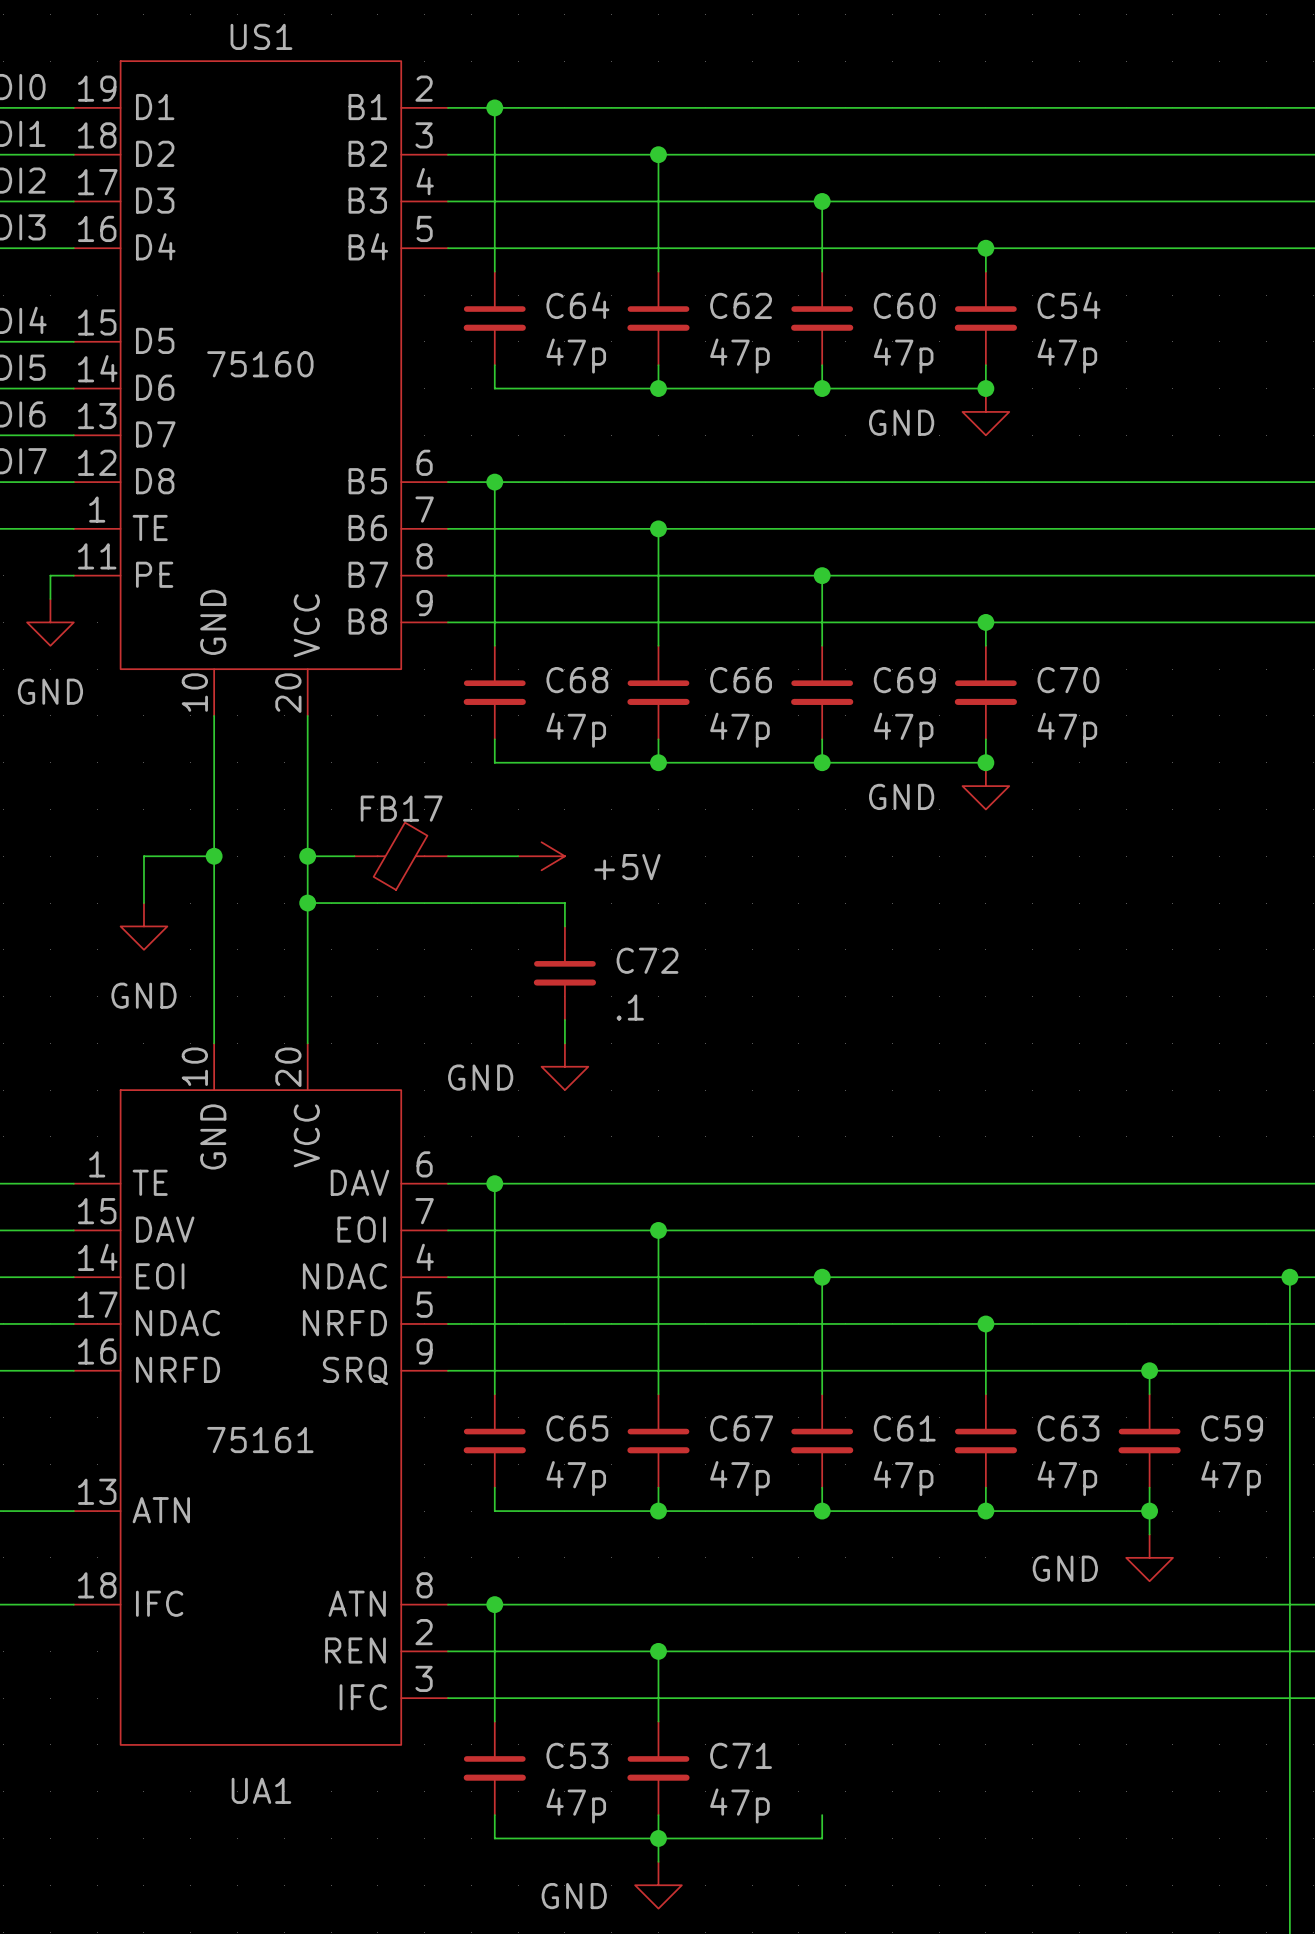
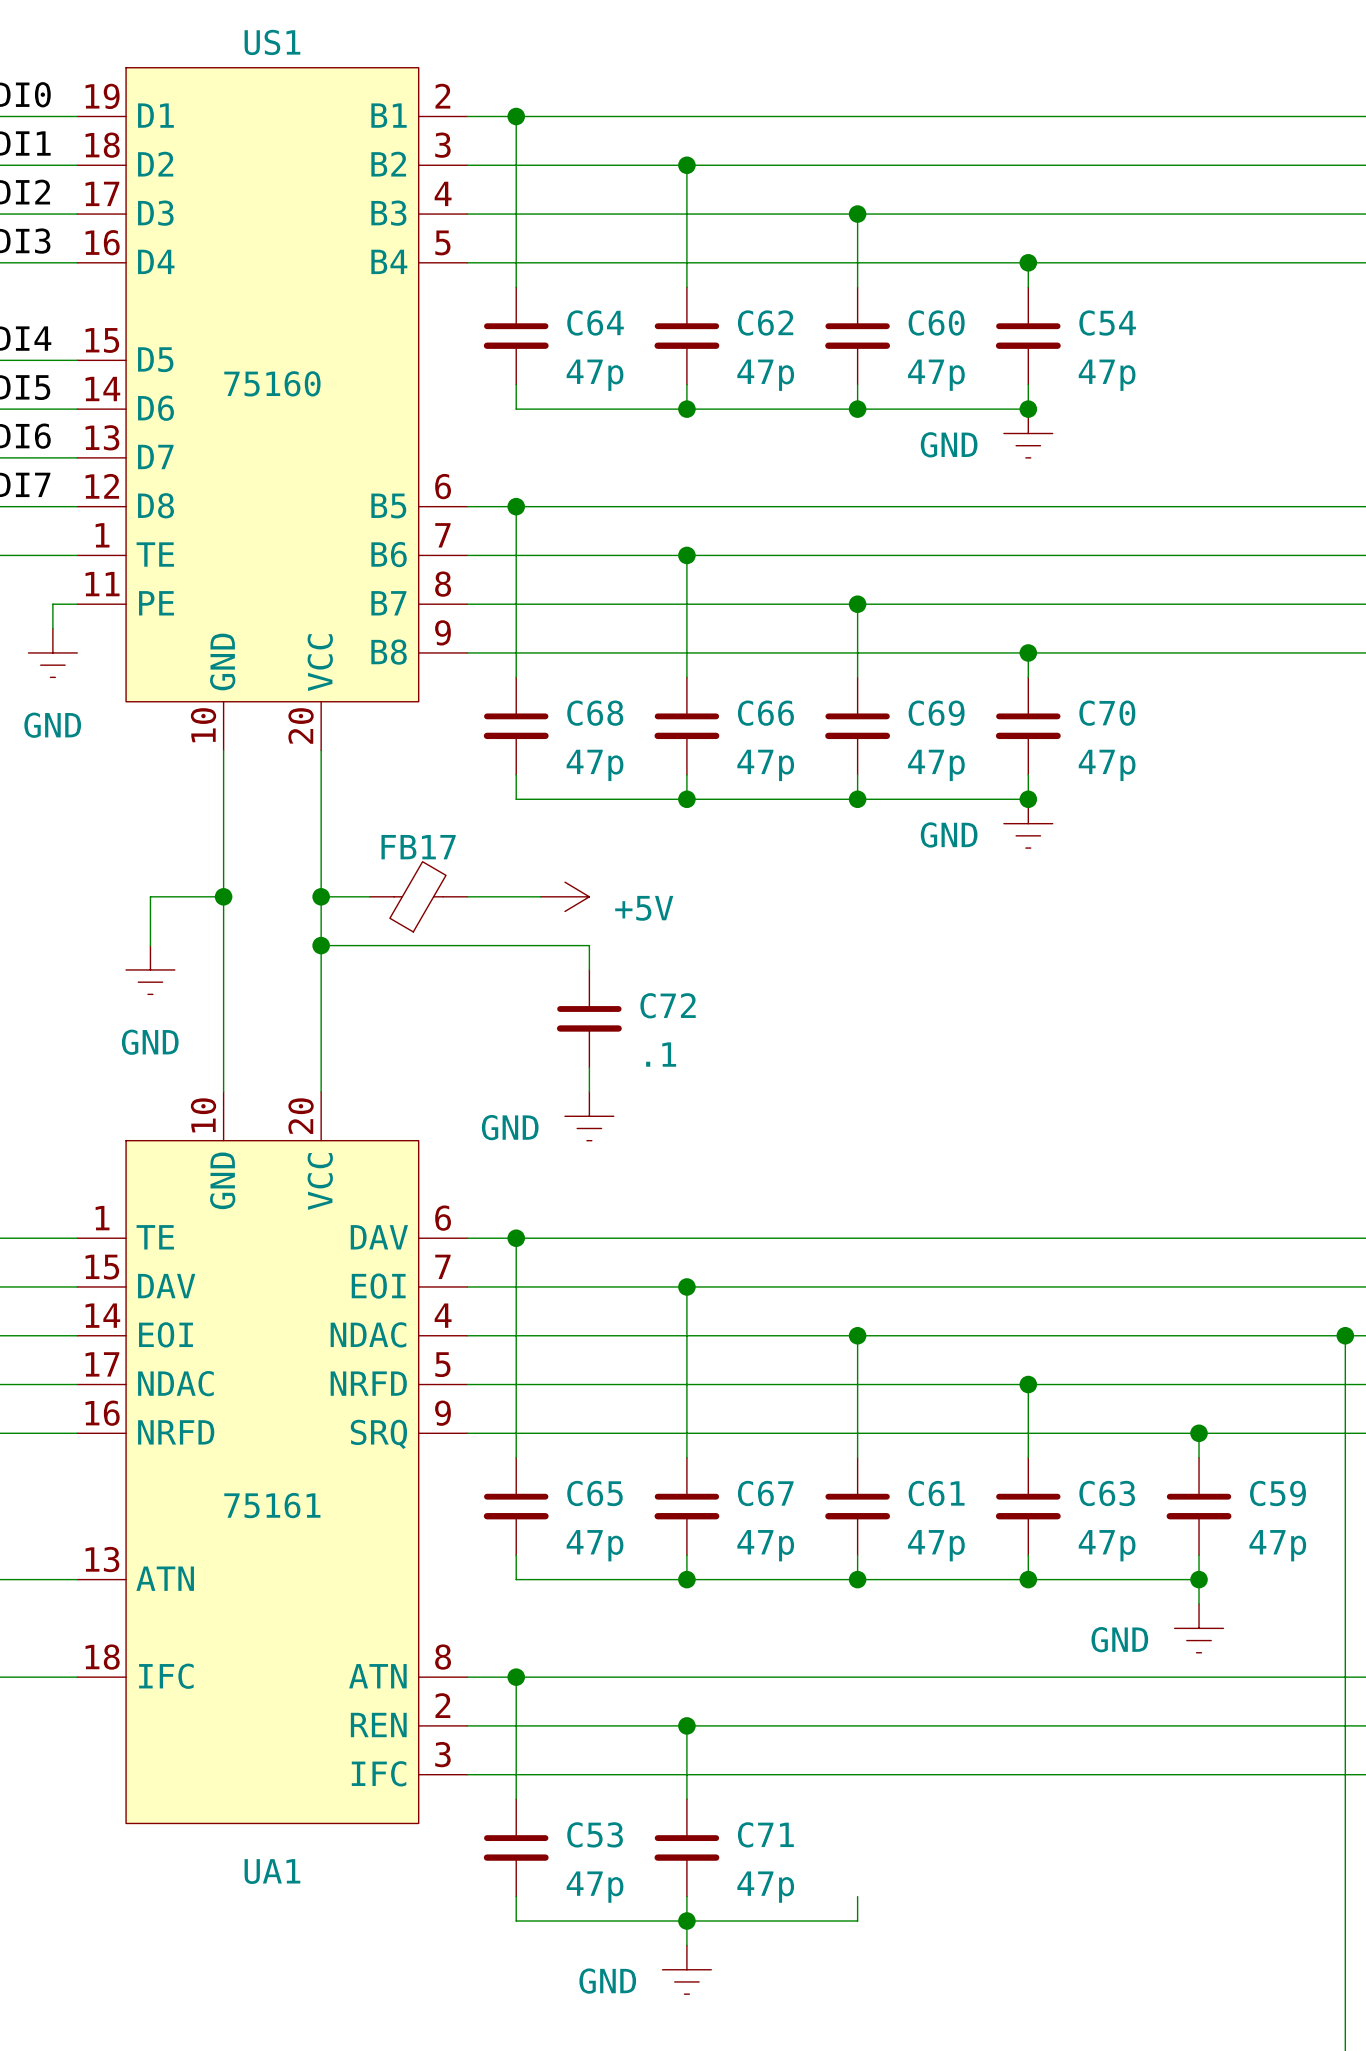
power symbol shape: [962, 388, 1010, 436] -> [1003, 409, 1053, 458]
power symbol shape: [27, 599, 74, 646] -> [28, 628, 78, 678]
power symbol shape: [962, 762, 1010, 810] -> [1003, 799, 1053, 849]
power symbol shape: [120, 903, 168, 950] -> [126, 945, 175, 995]
power symbol shape: [541, 1043, 589, 1091] -> [564, 1091, 614, 1141]
power symbol shape: [1126, 1534, 1173, 1582] -> [1174, 1603, 1224, 1653]
power symbol shape: [635, 1861, 682, 1909] -> [662, 1945, 712, 1995]

